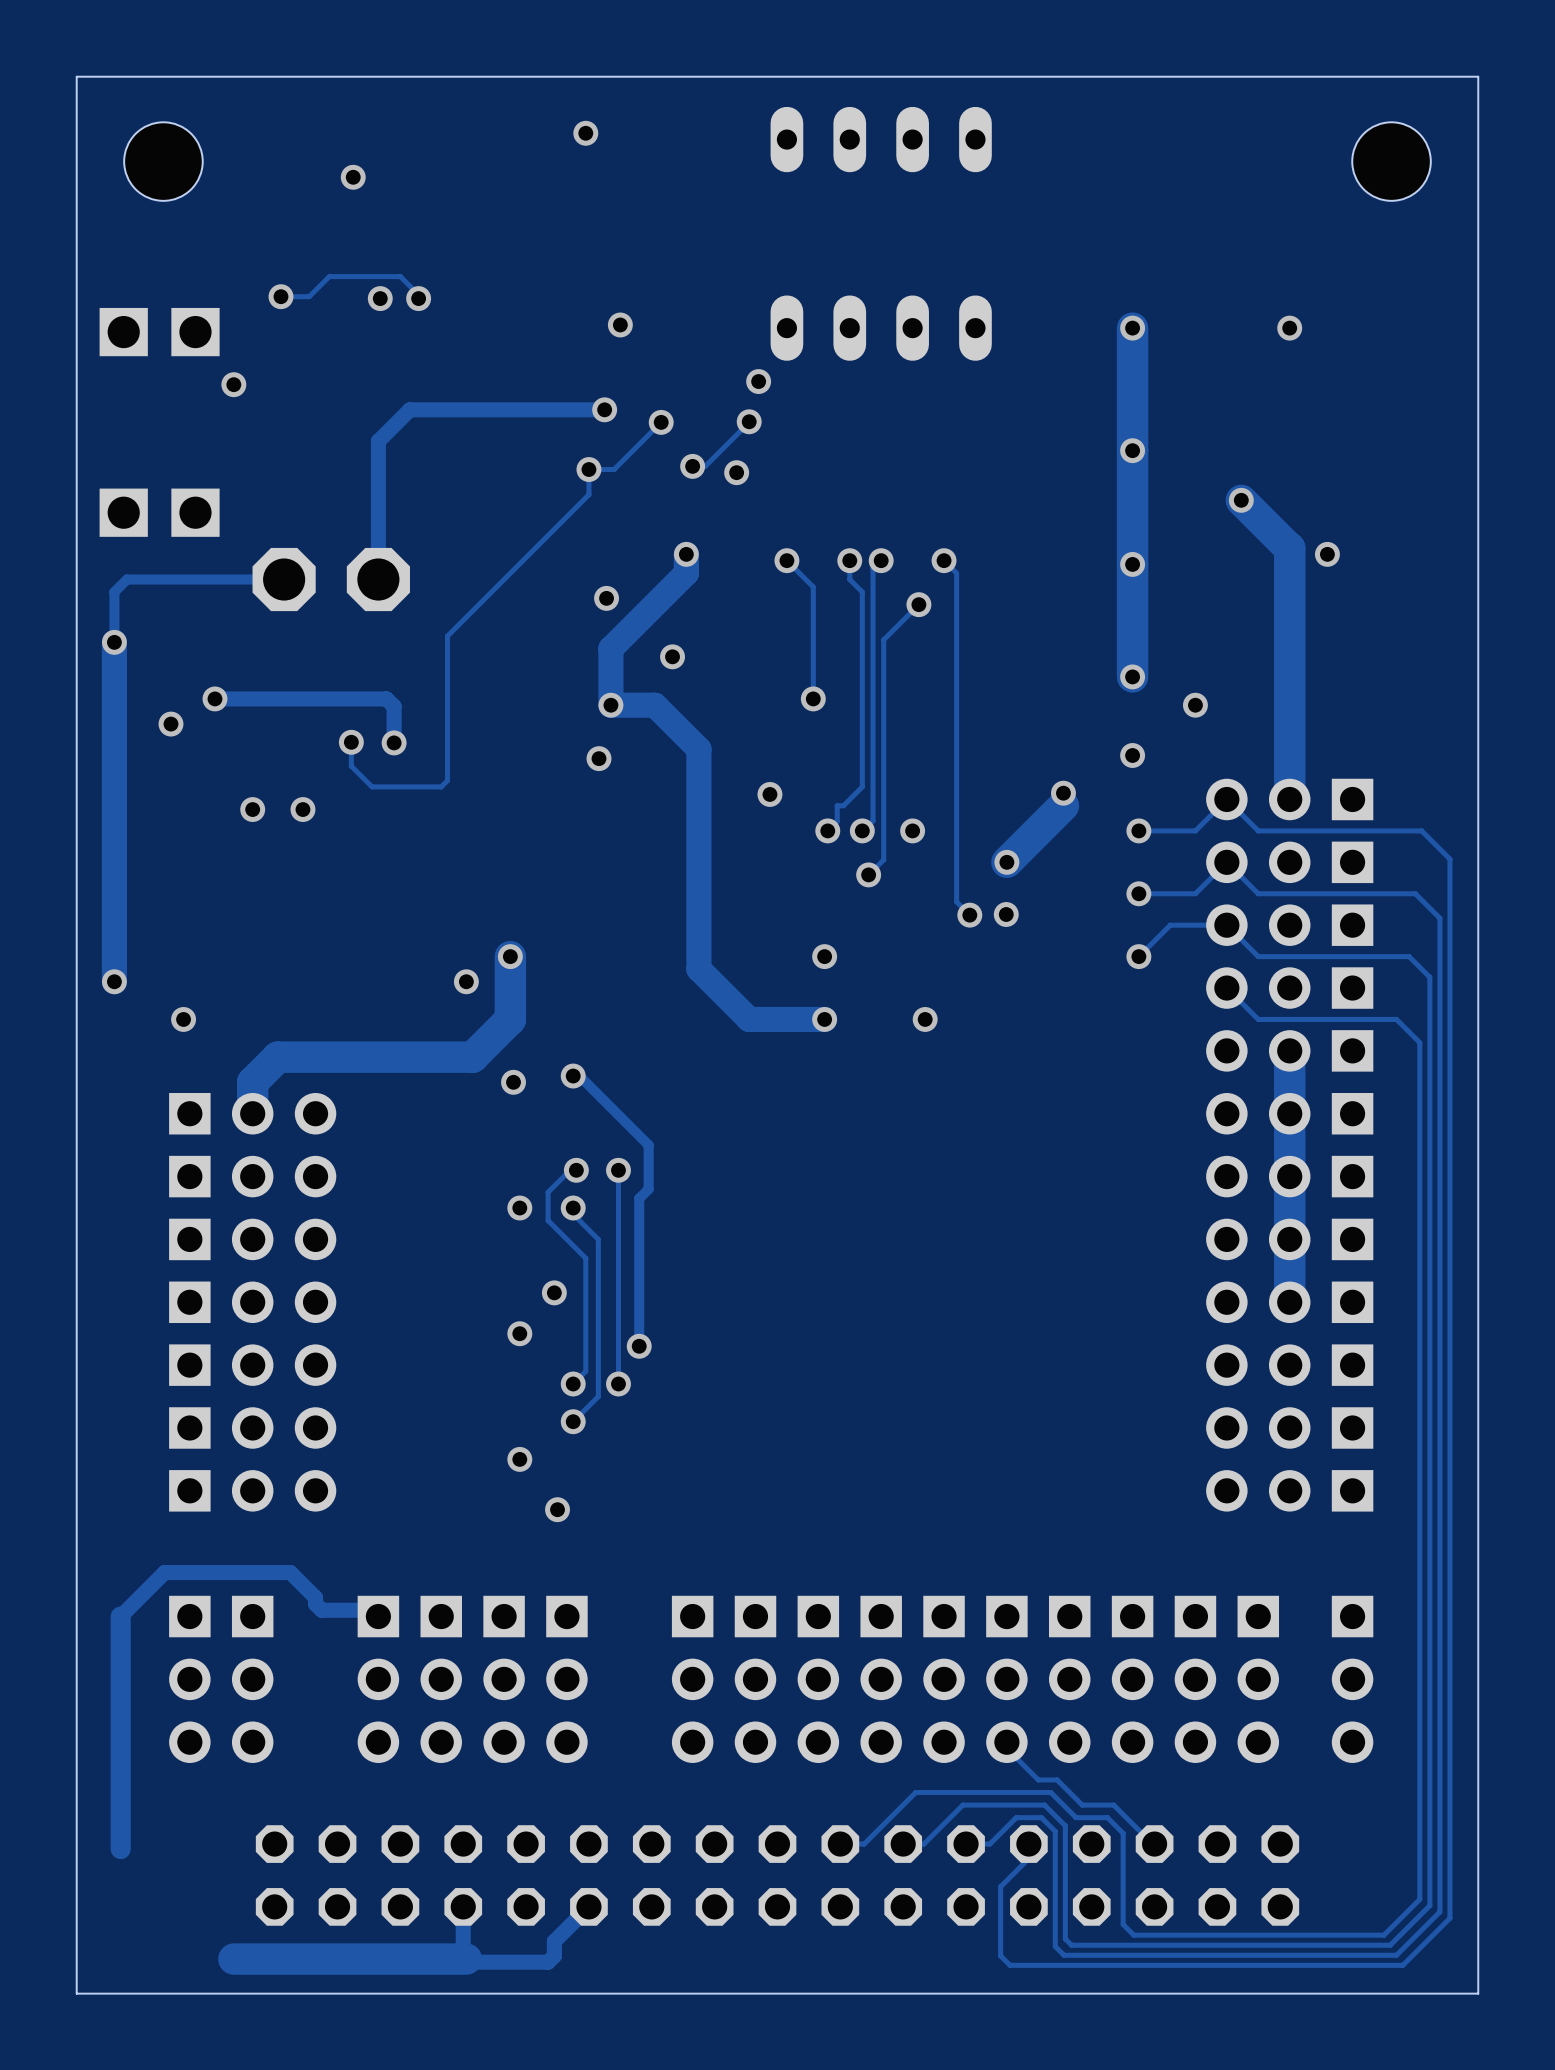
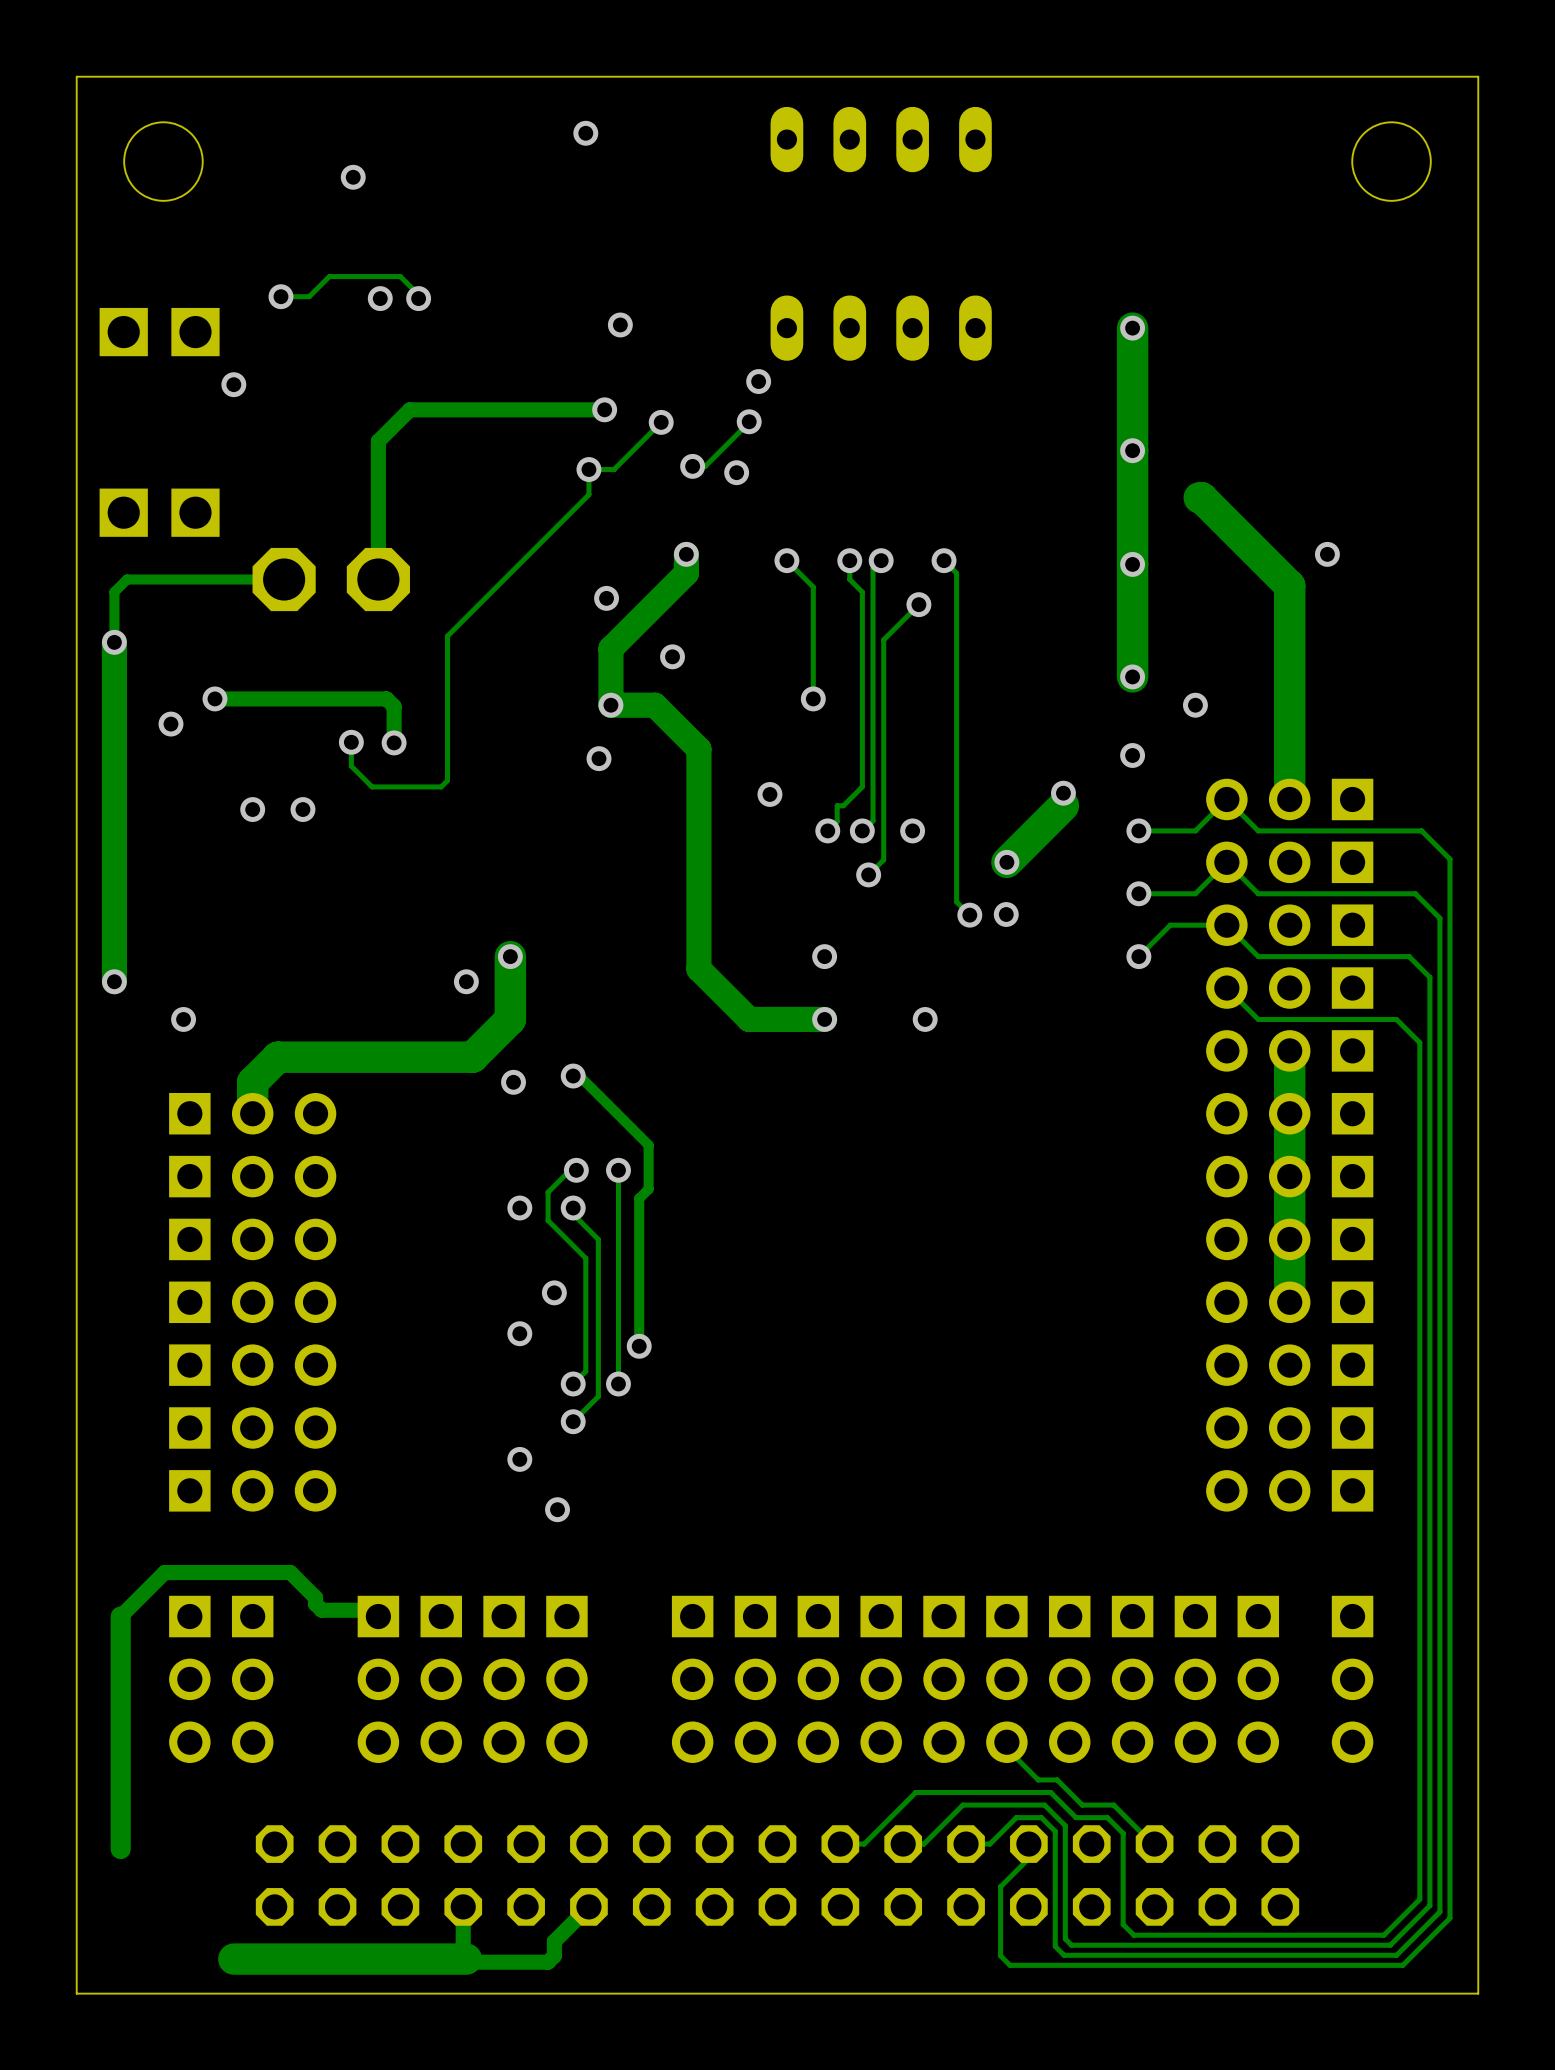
via: (1289, 328) -> none
track: (1241, 500) (1289, 548) (1289, 585) -> (1199, 497) (1201, 497) (1289, 585)
via: (1241, 500) -> none

